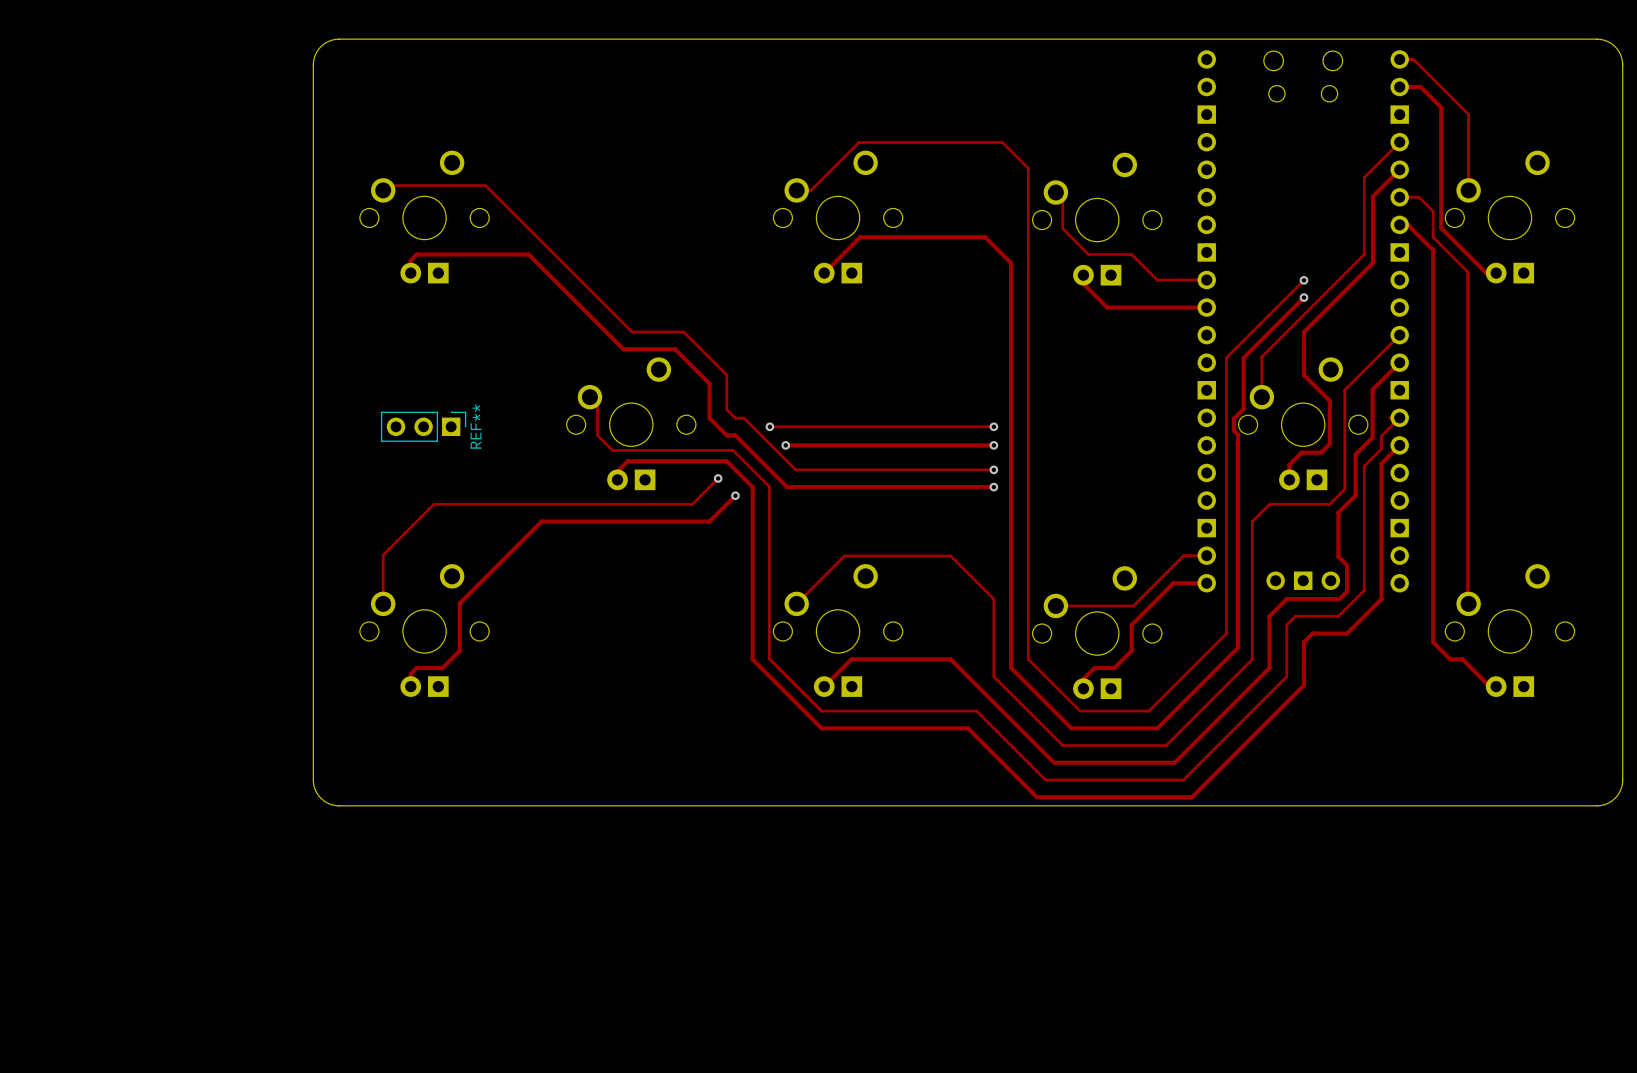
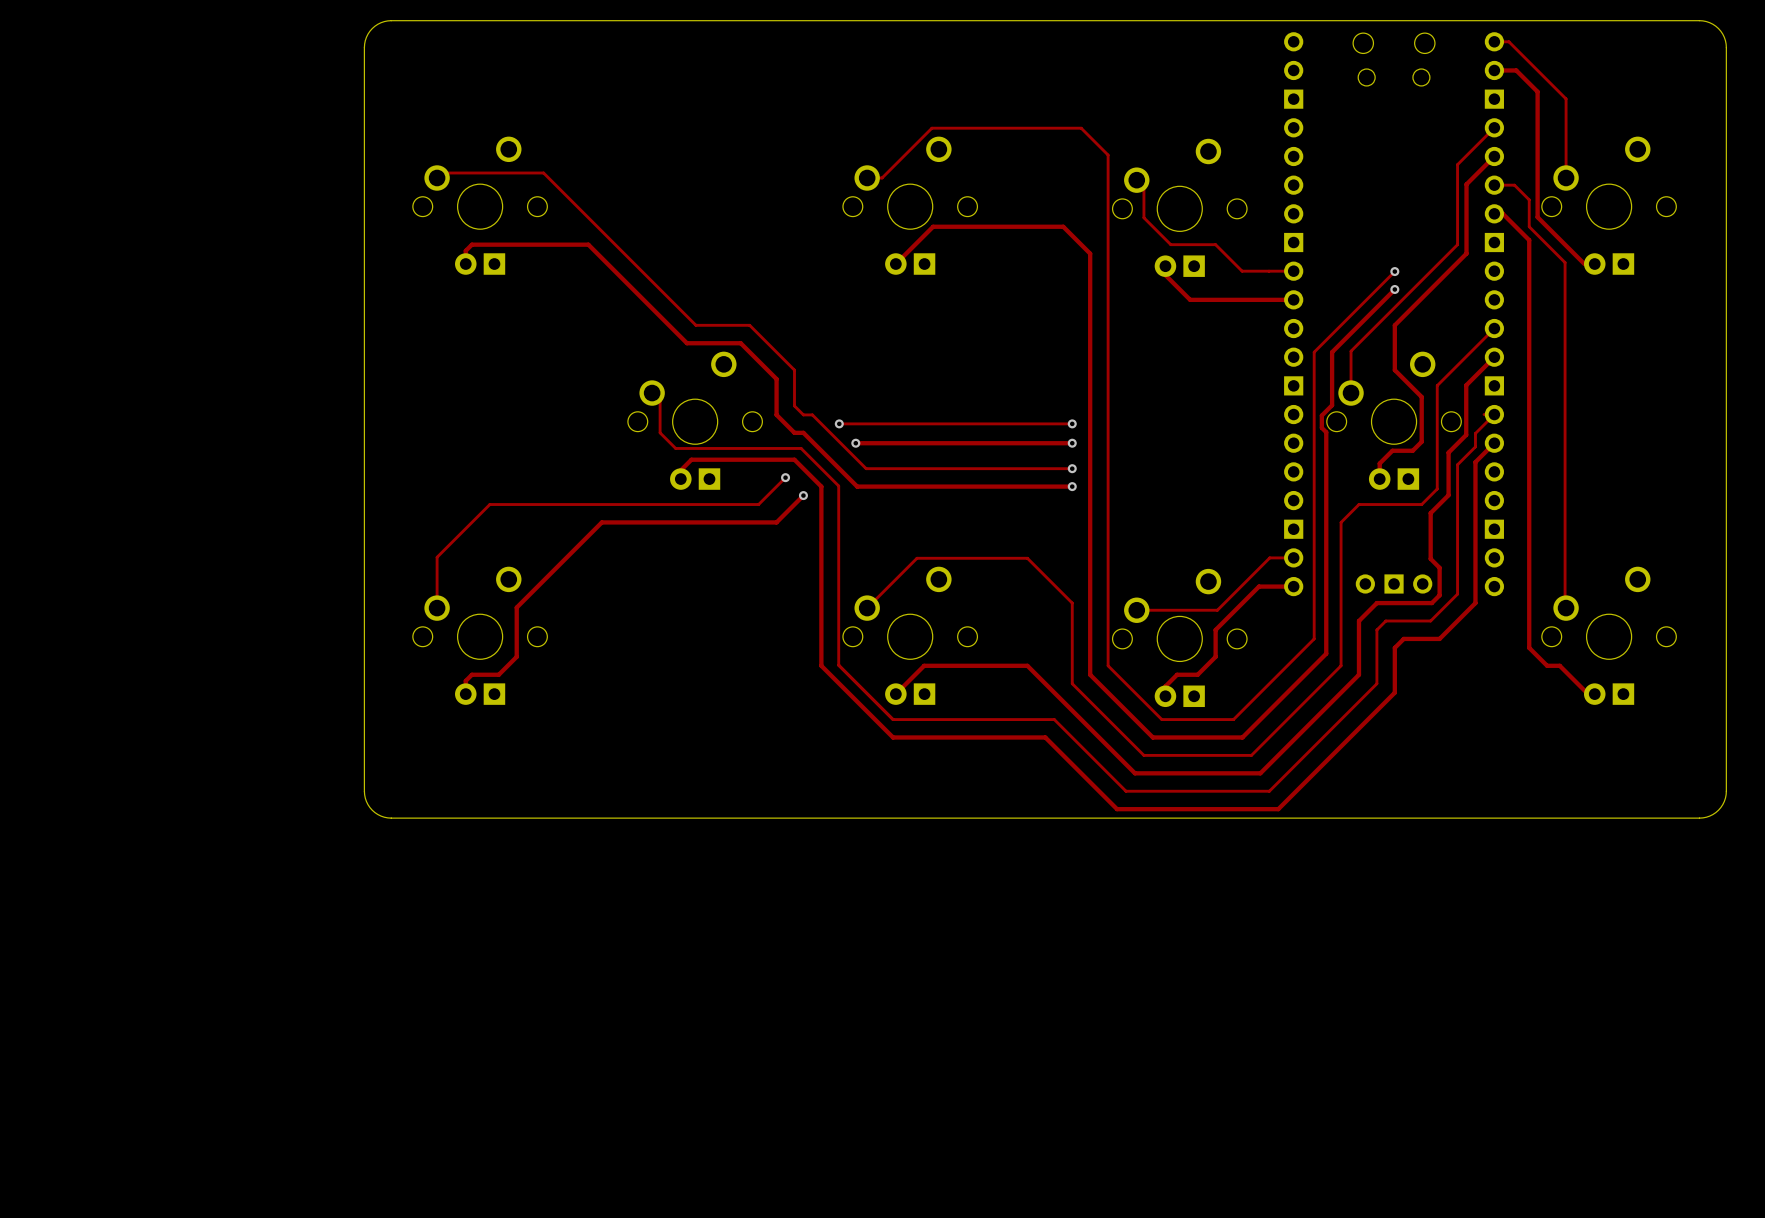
REF**: (423, 426) -> none

